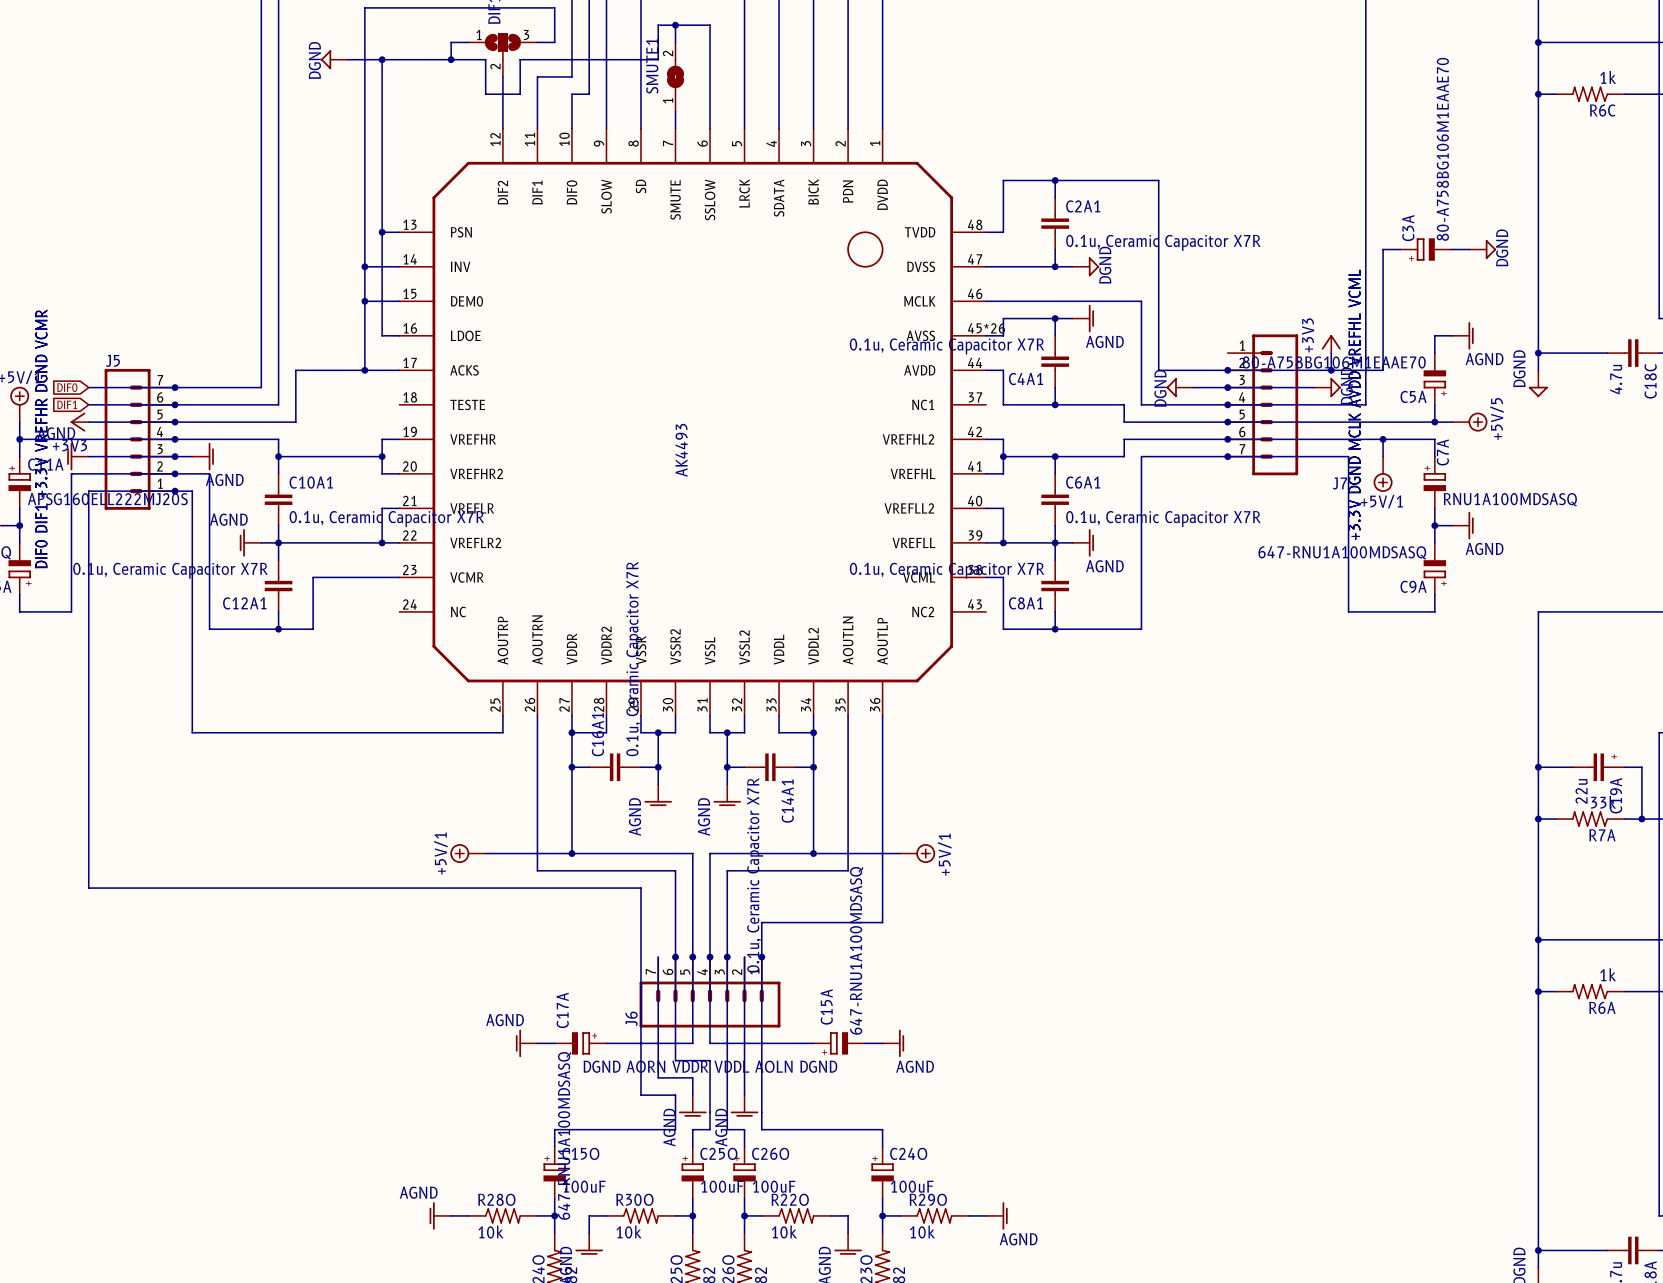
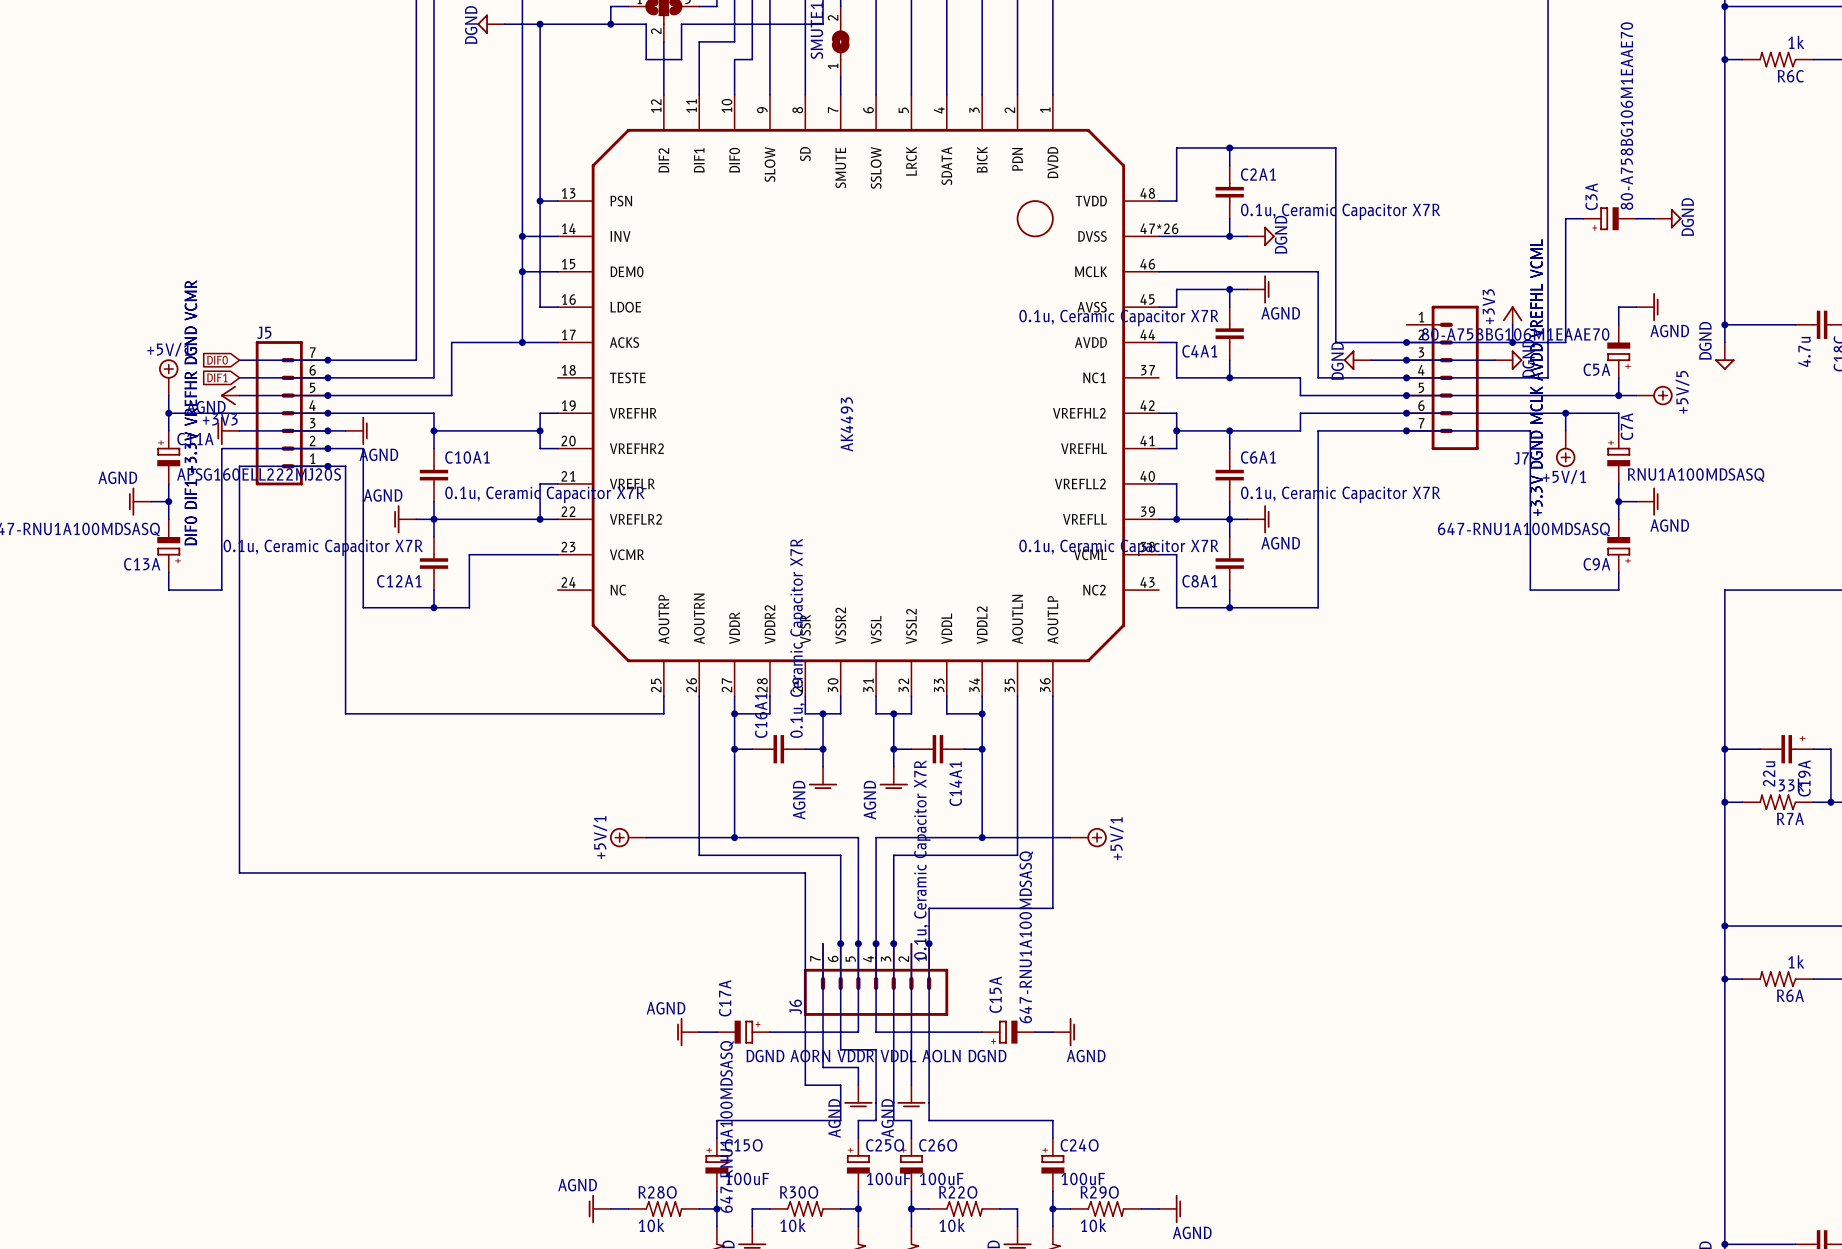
part pin number: 47 (975, 259) -> 47*26 (1159, 228)
part pin number: 45*26 (986, 328) -> 45 (1147, 299)

